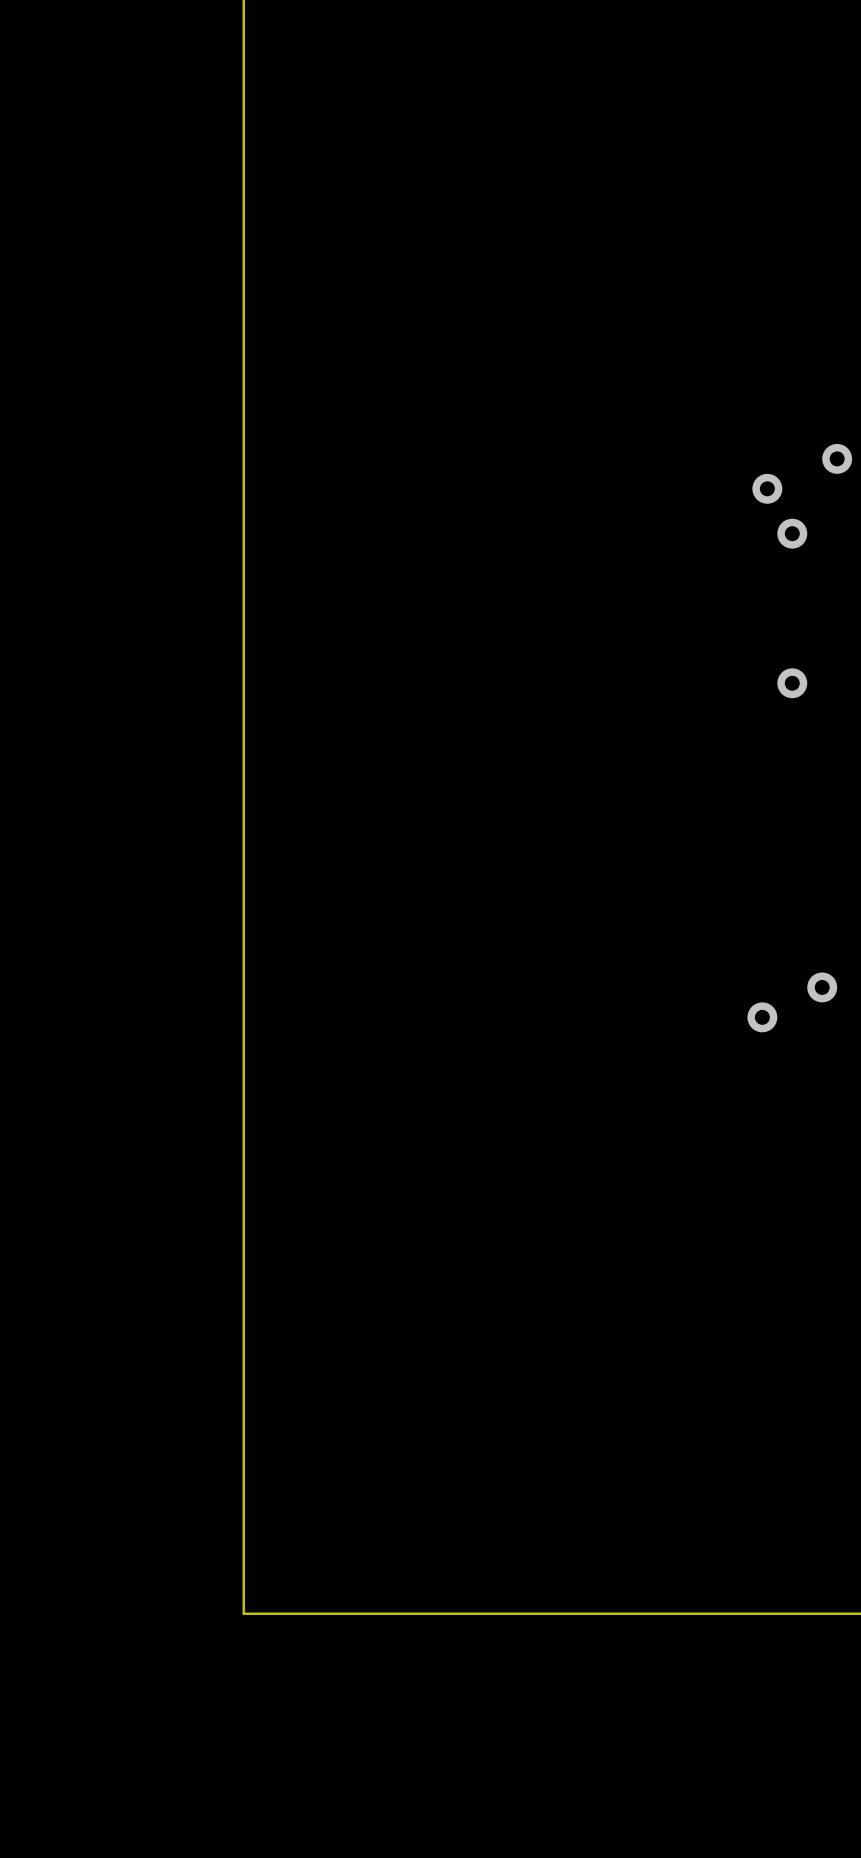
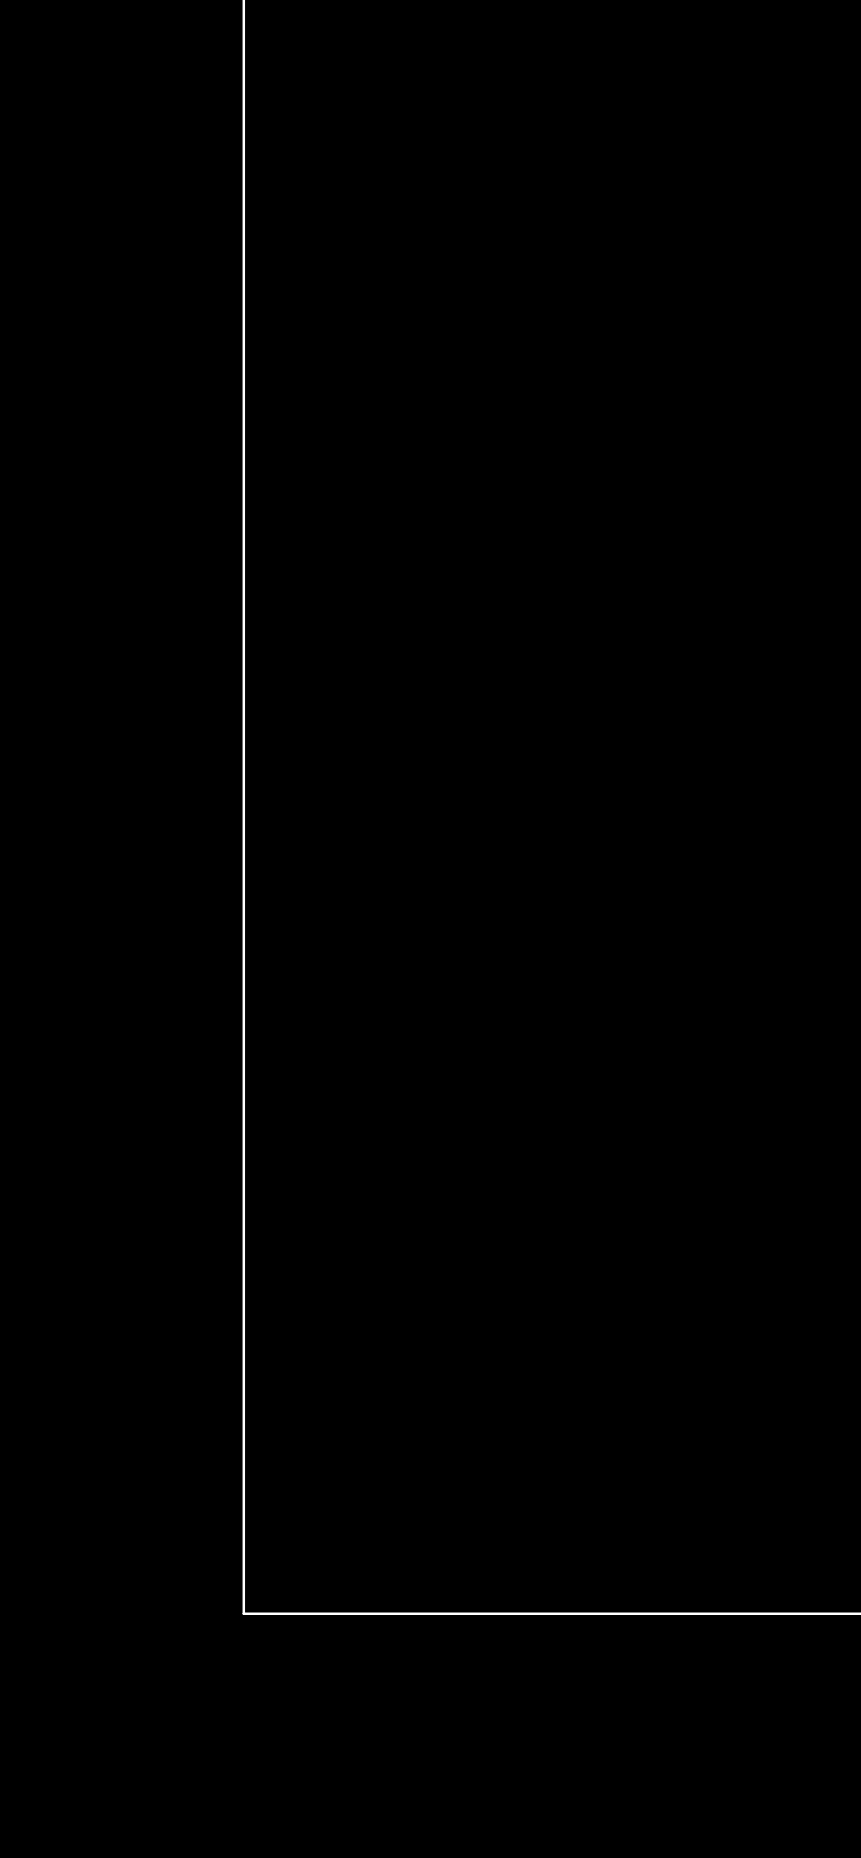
via: (837, 458) -> none
via: (767, 488) -> none
via: (792, 533) -> none
via: (792, 683) -> none
via: (822, 987) -> none
via: (762, 1017) -> none

